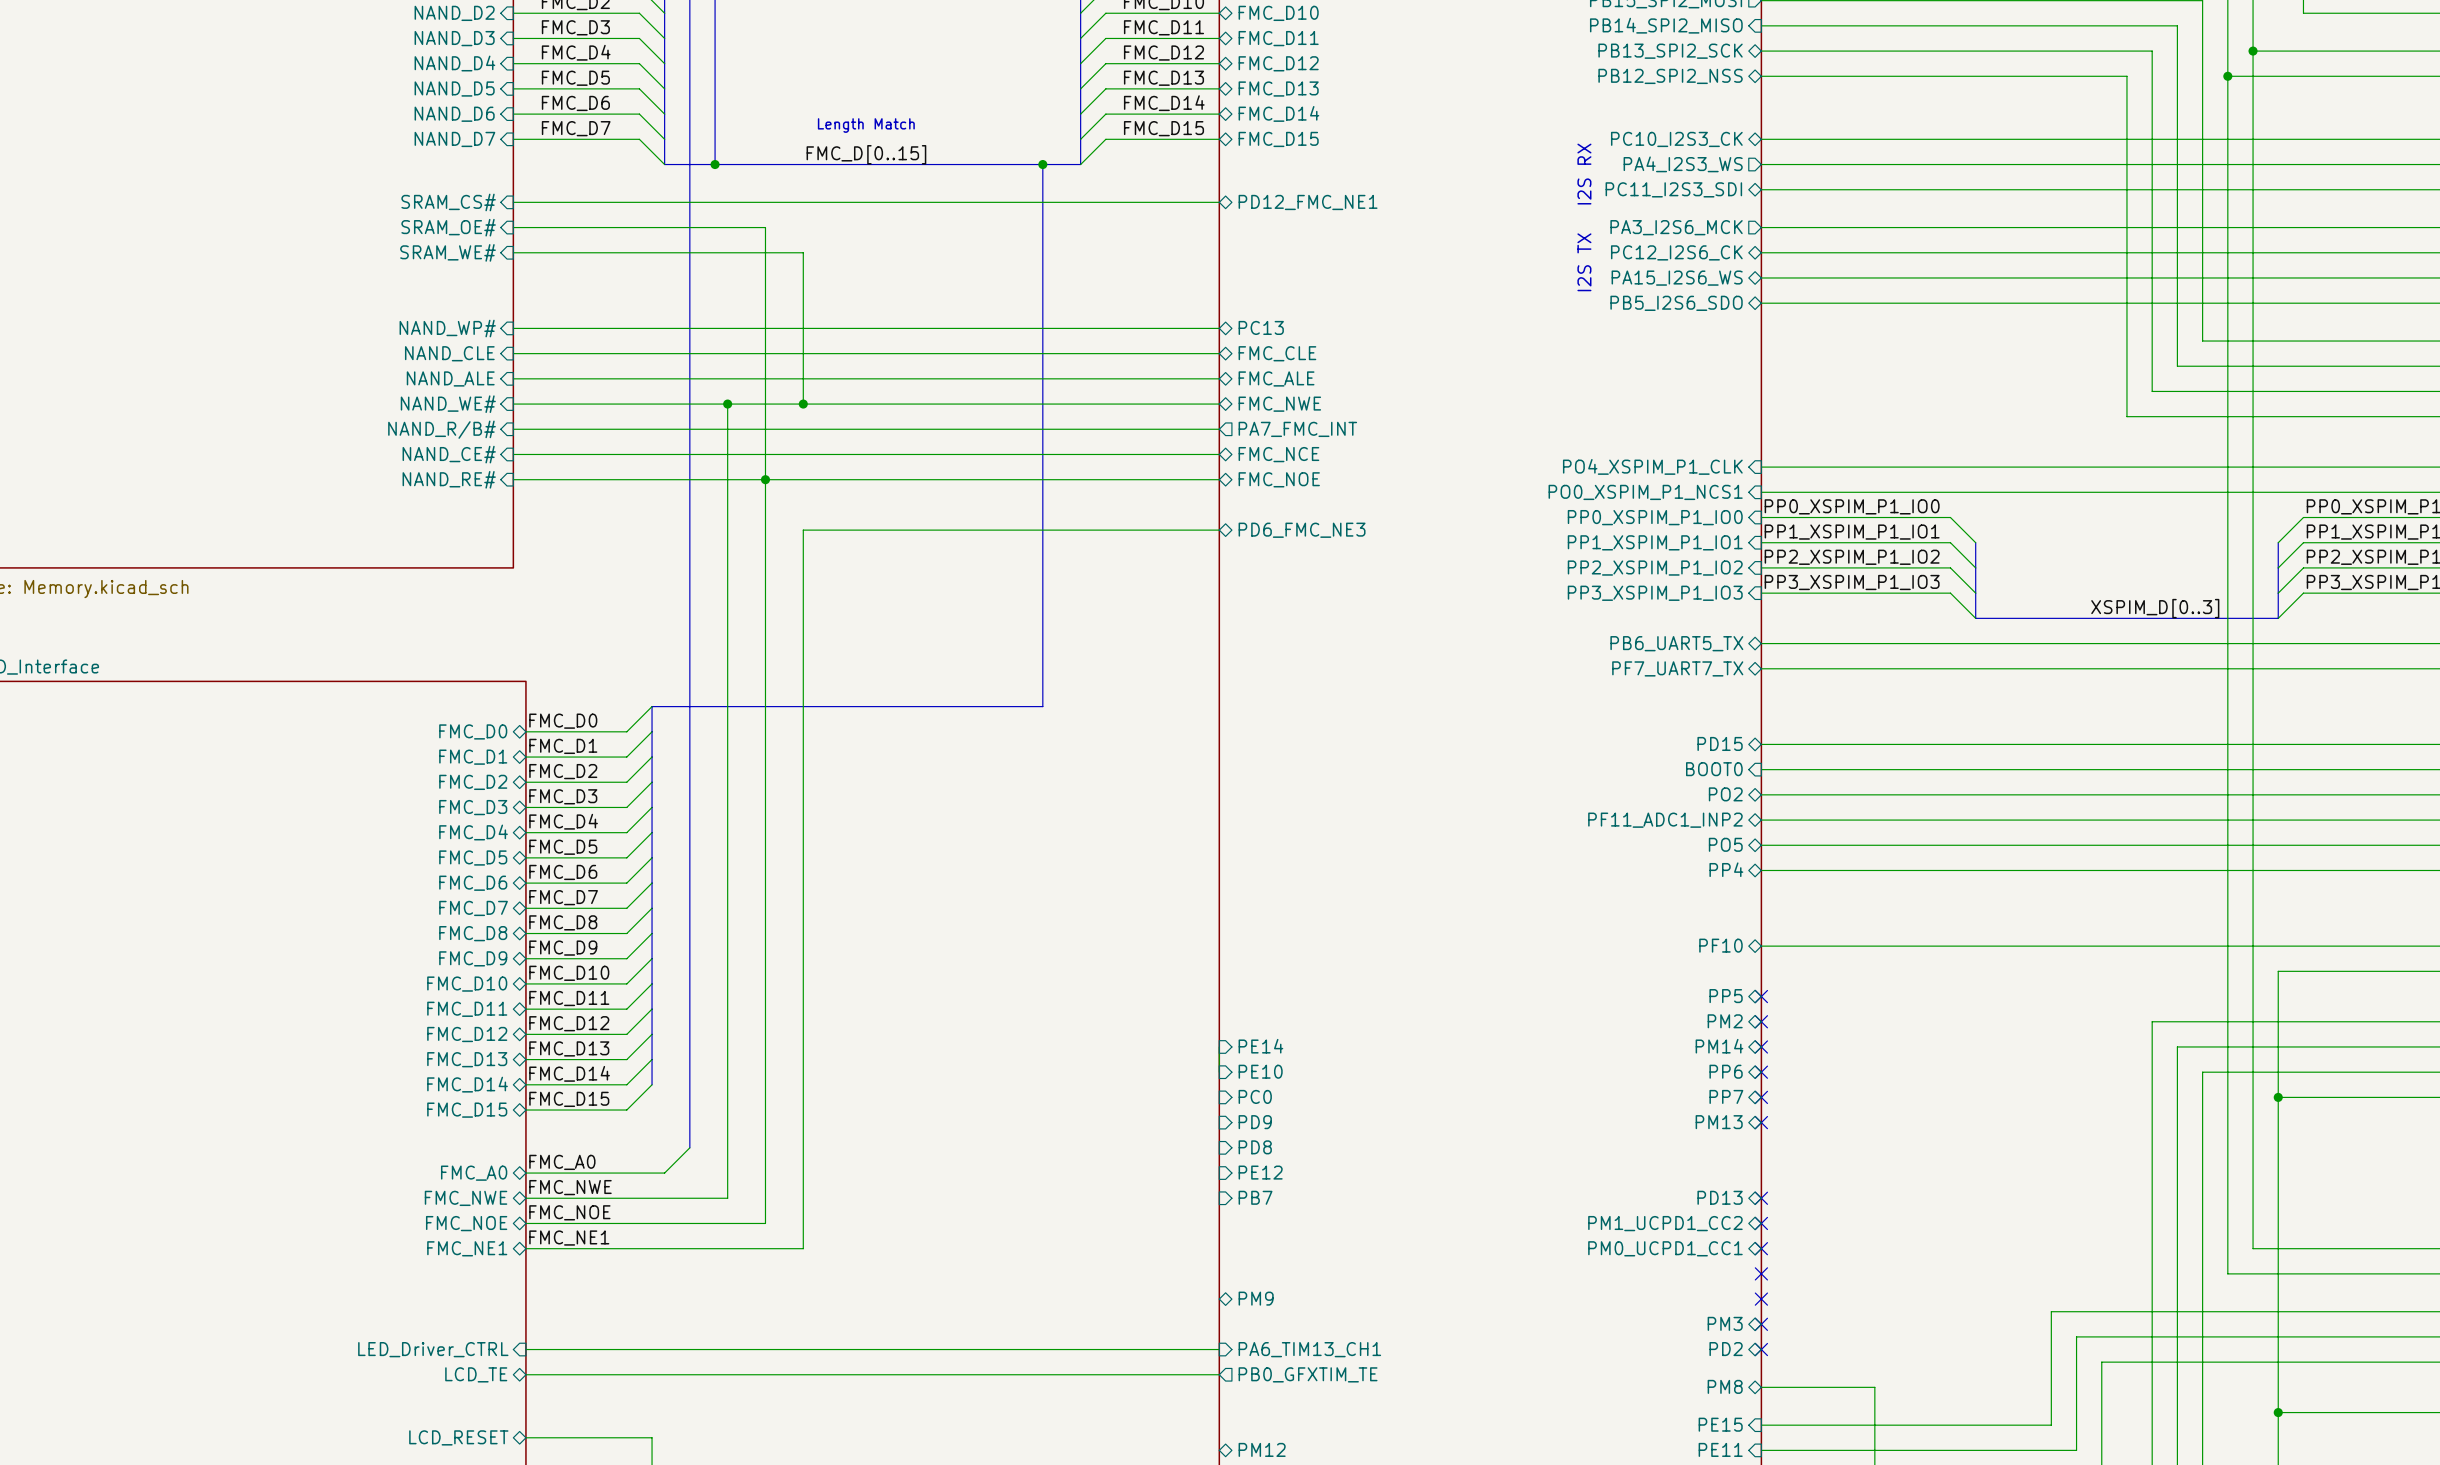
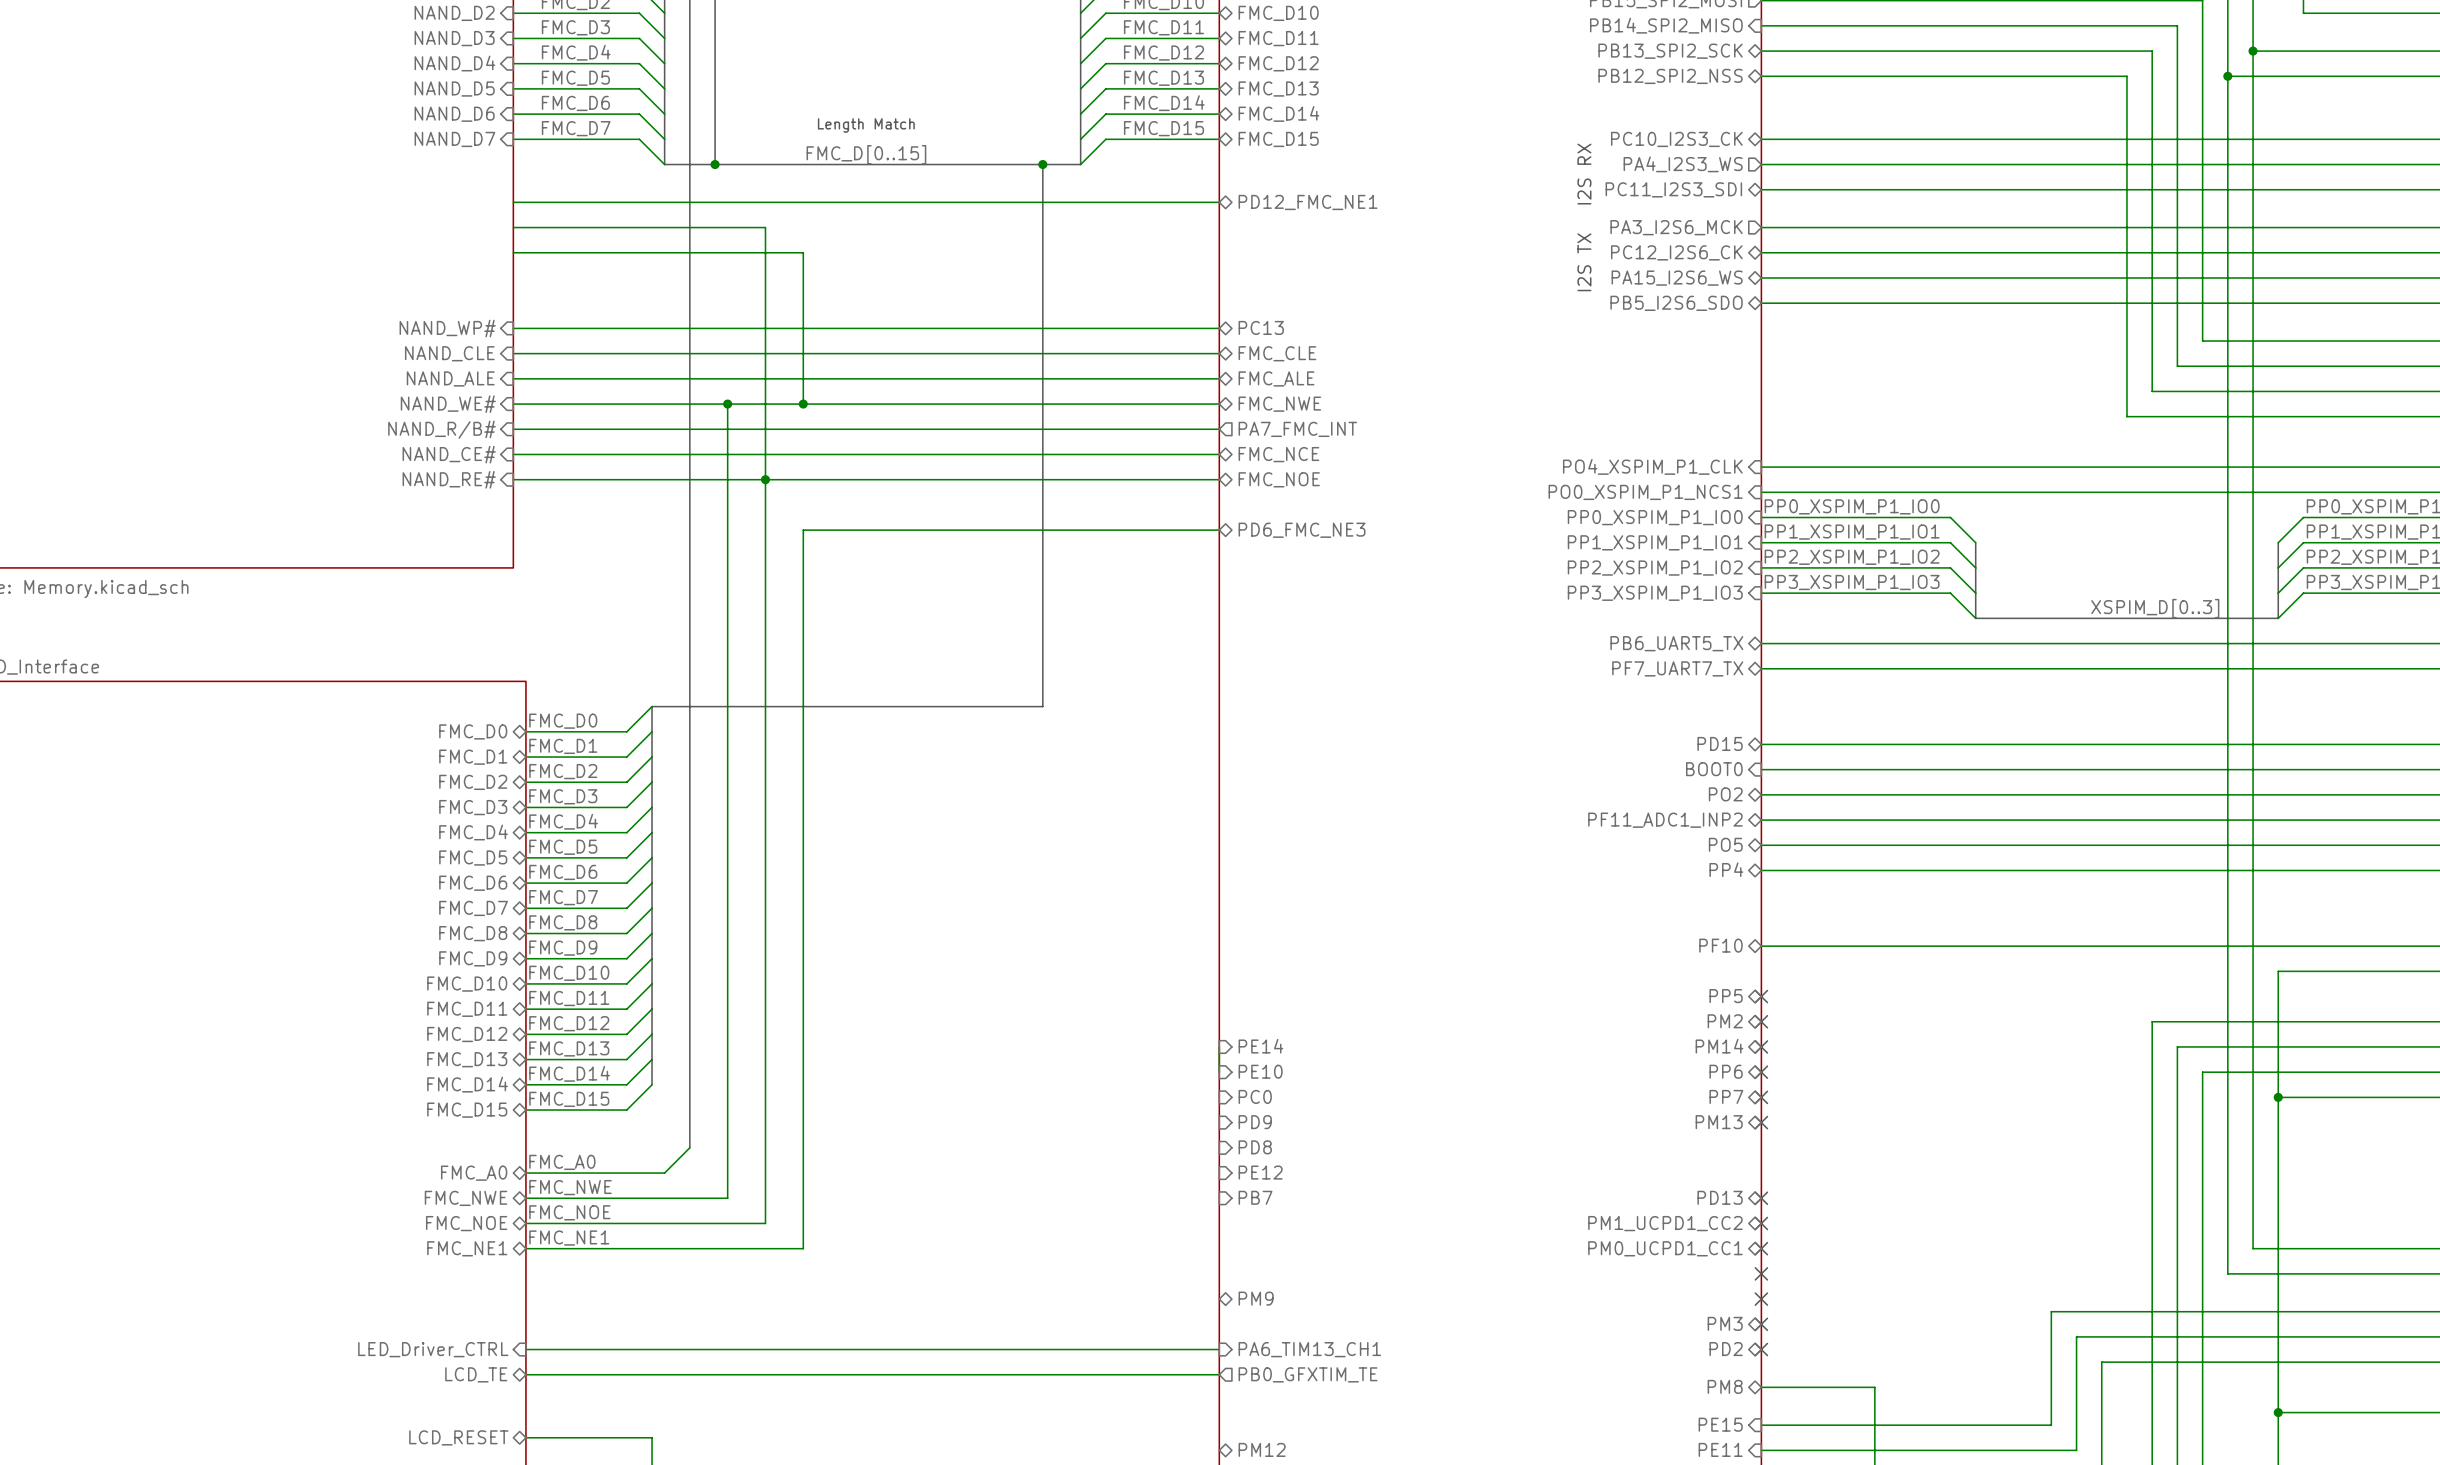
sheet pin: SRAM_CS# (448, 202) -> none
sheet pin: SRAM_OE# (448, 227) -> none
sheet pin: SRAM_WE# (448, 252) -> none

